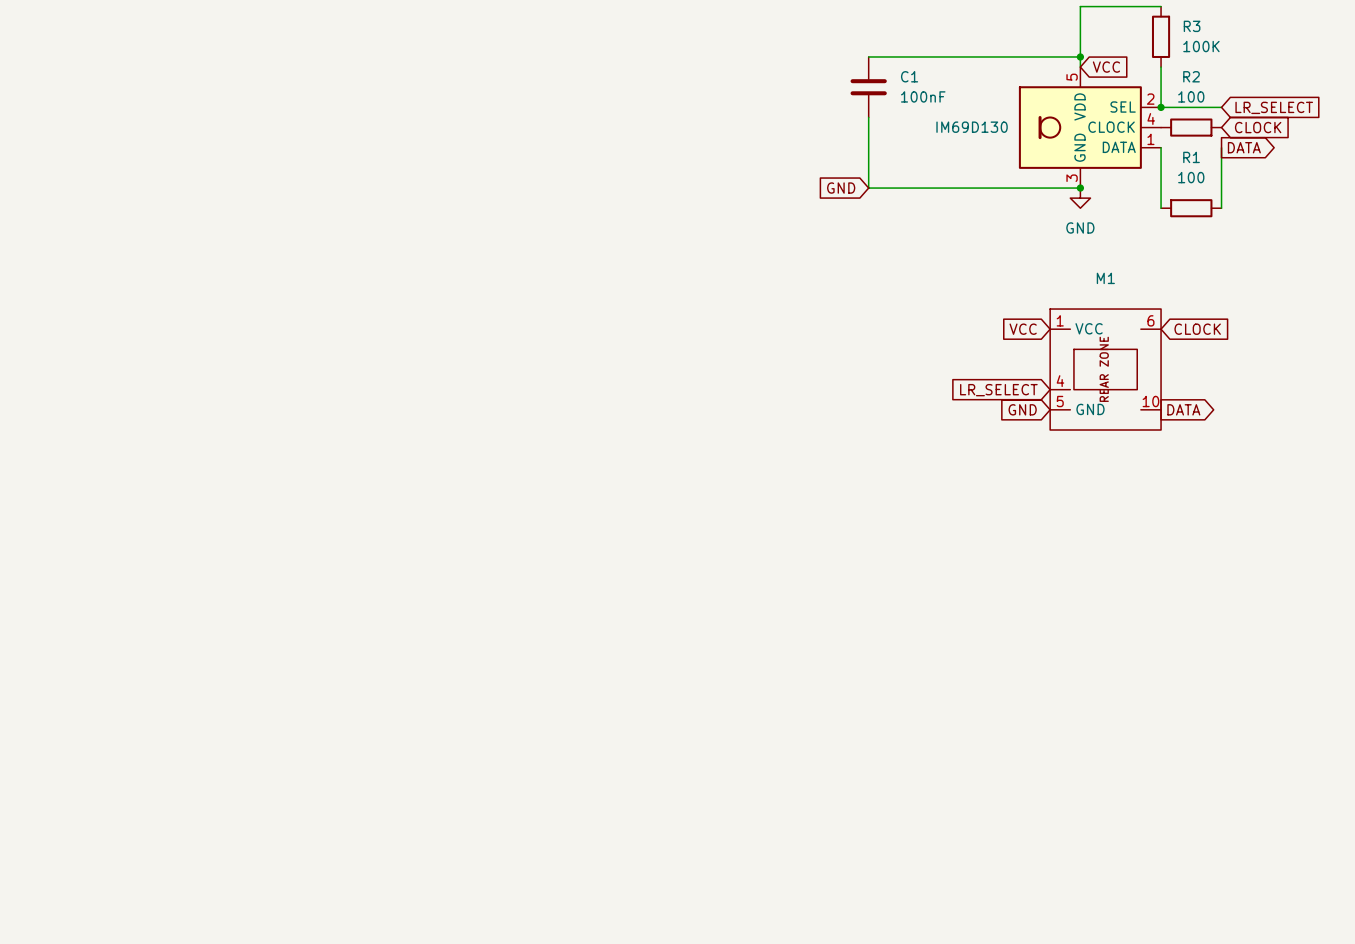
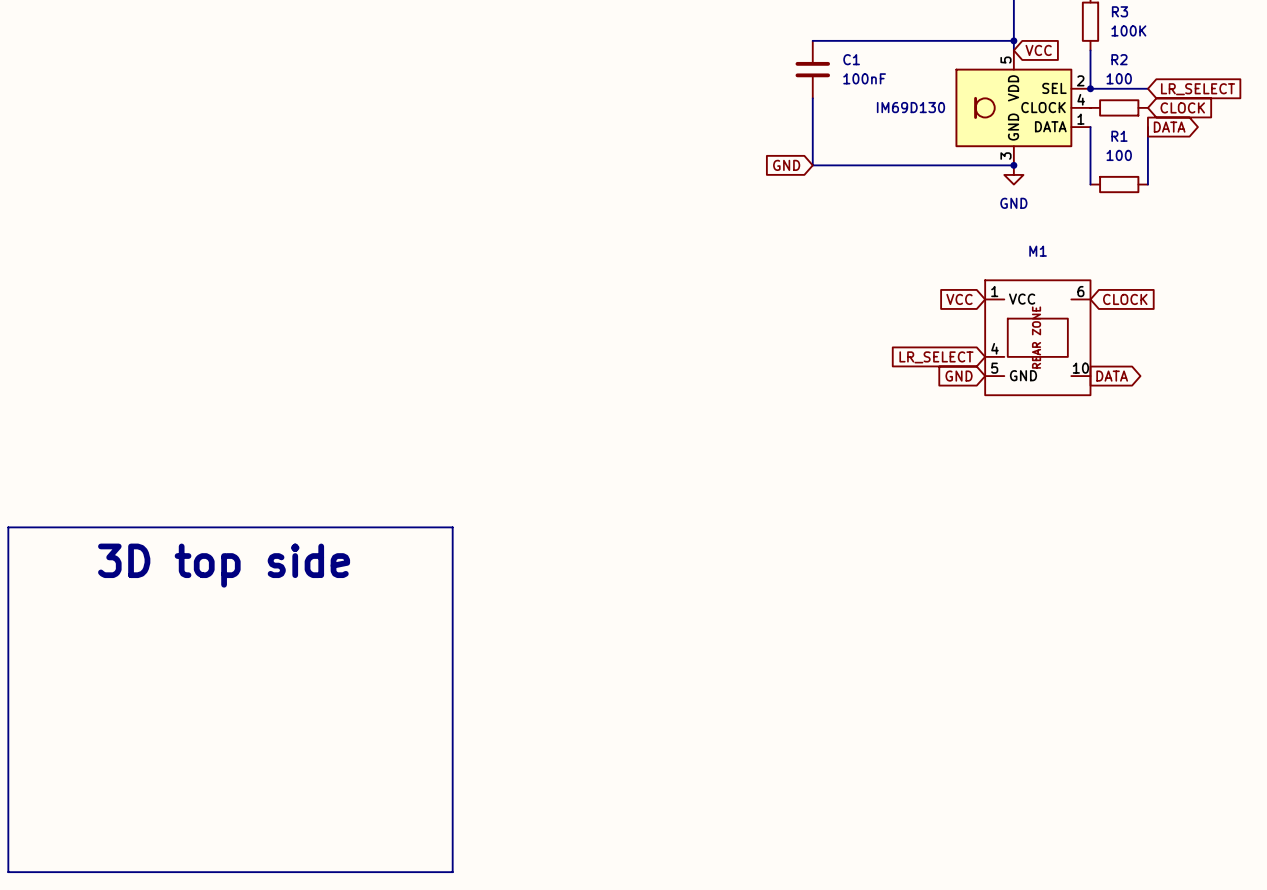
line: none -> (8, 527) (452, 527) (452, 872) (8, 872) (8, 527)
text: none -> 3D top side (224, 565)

